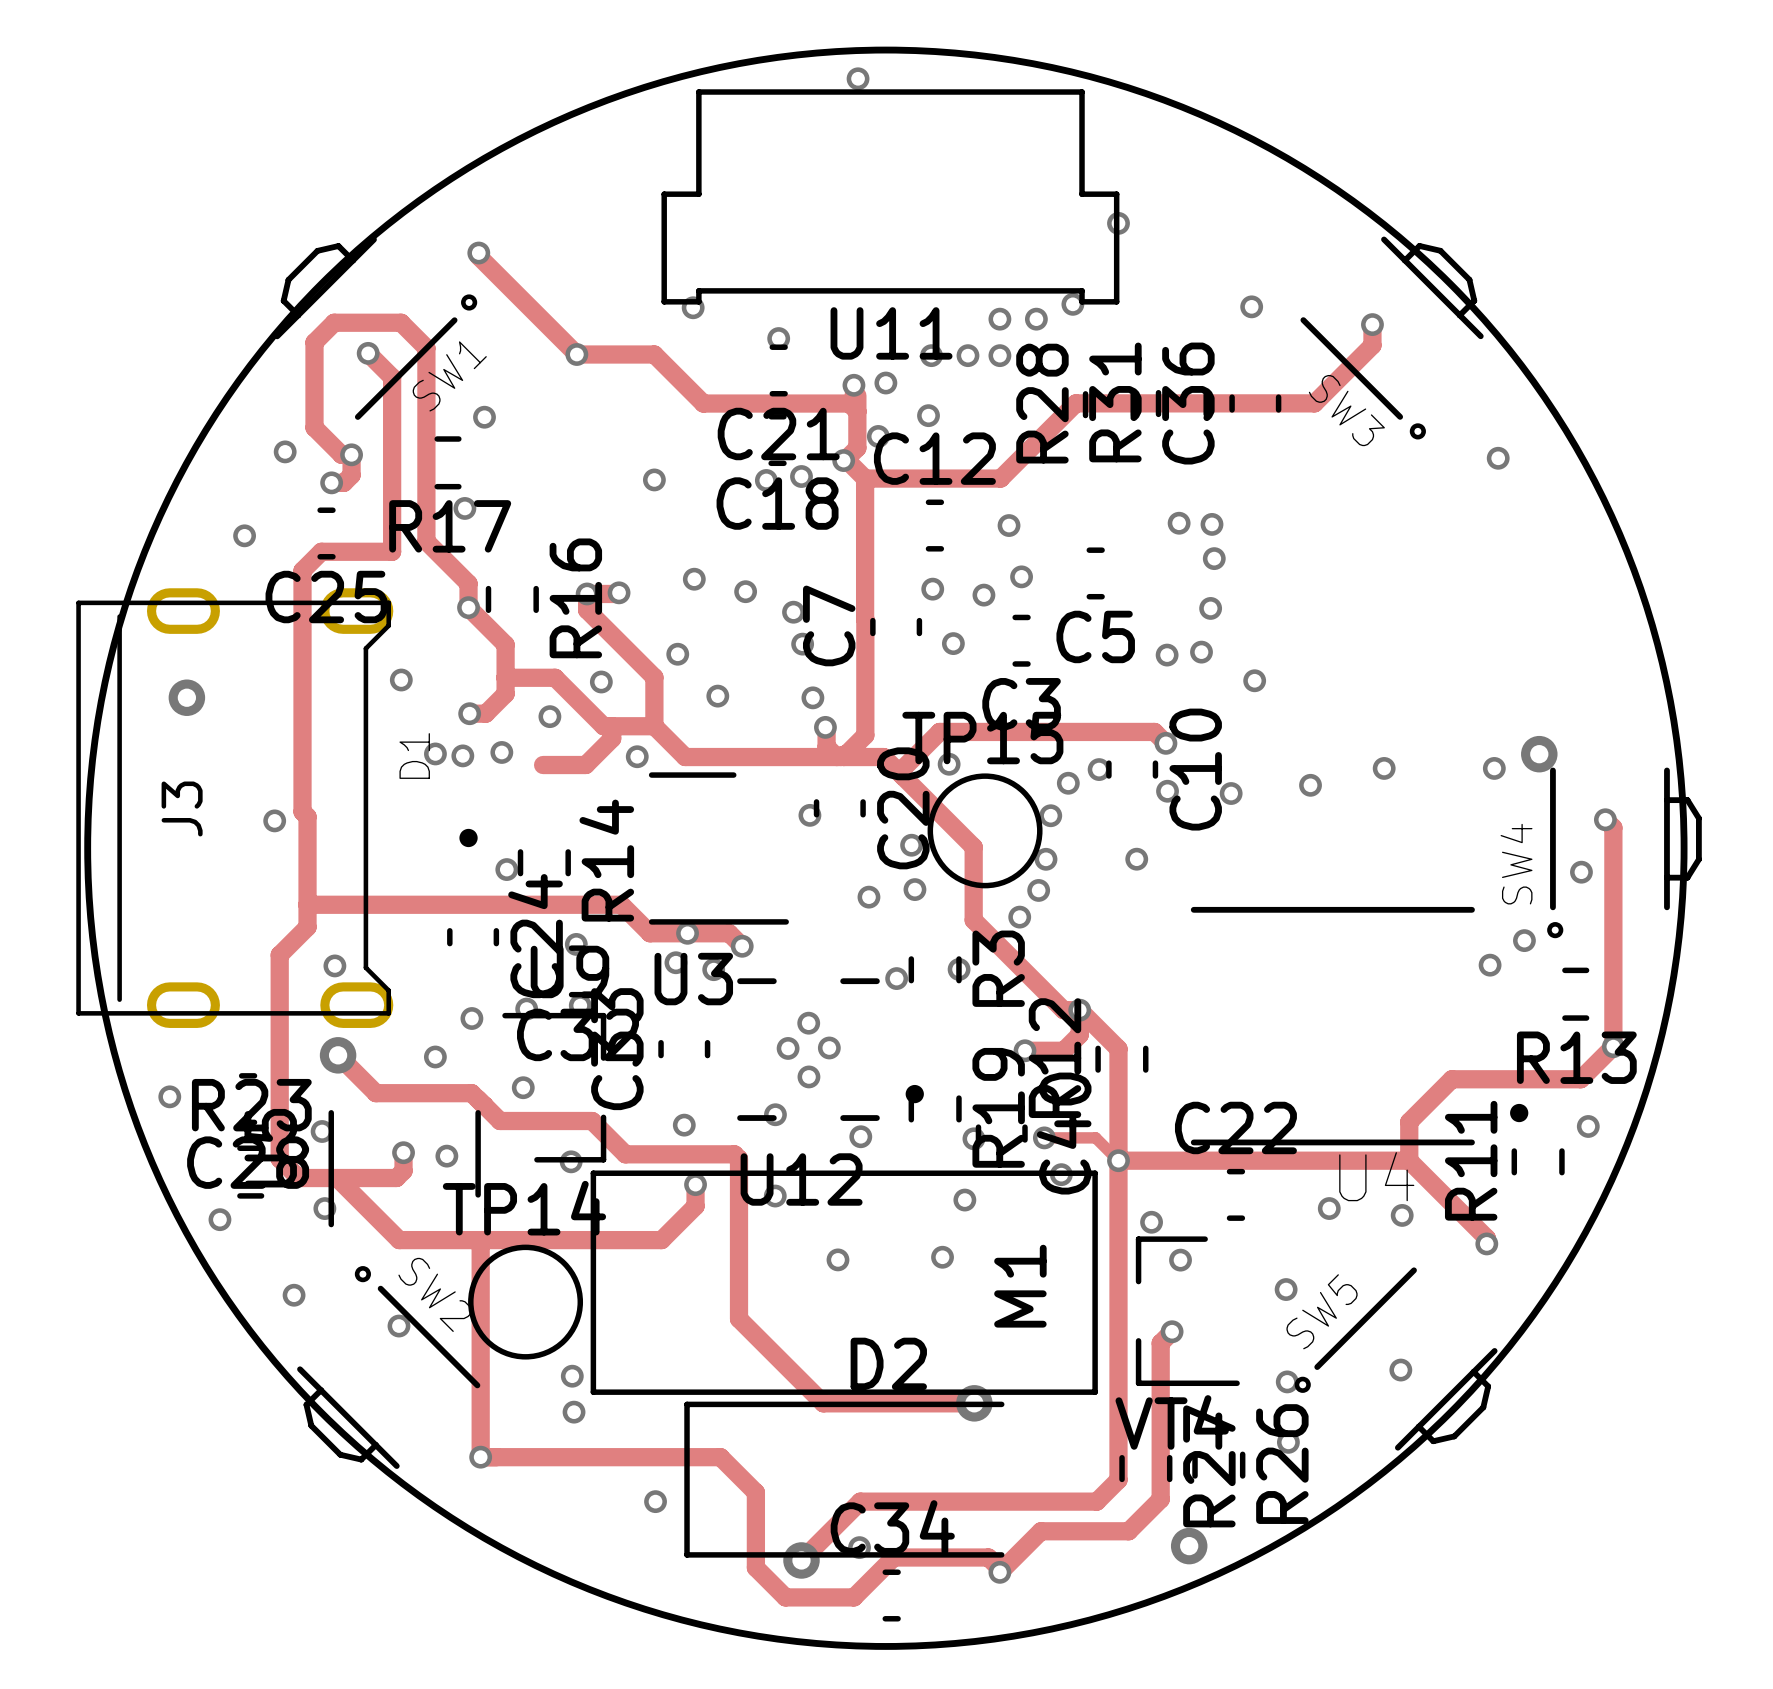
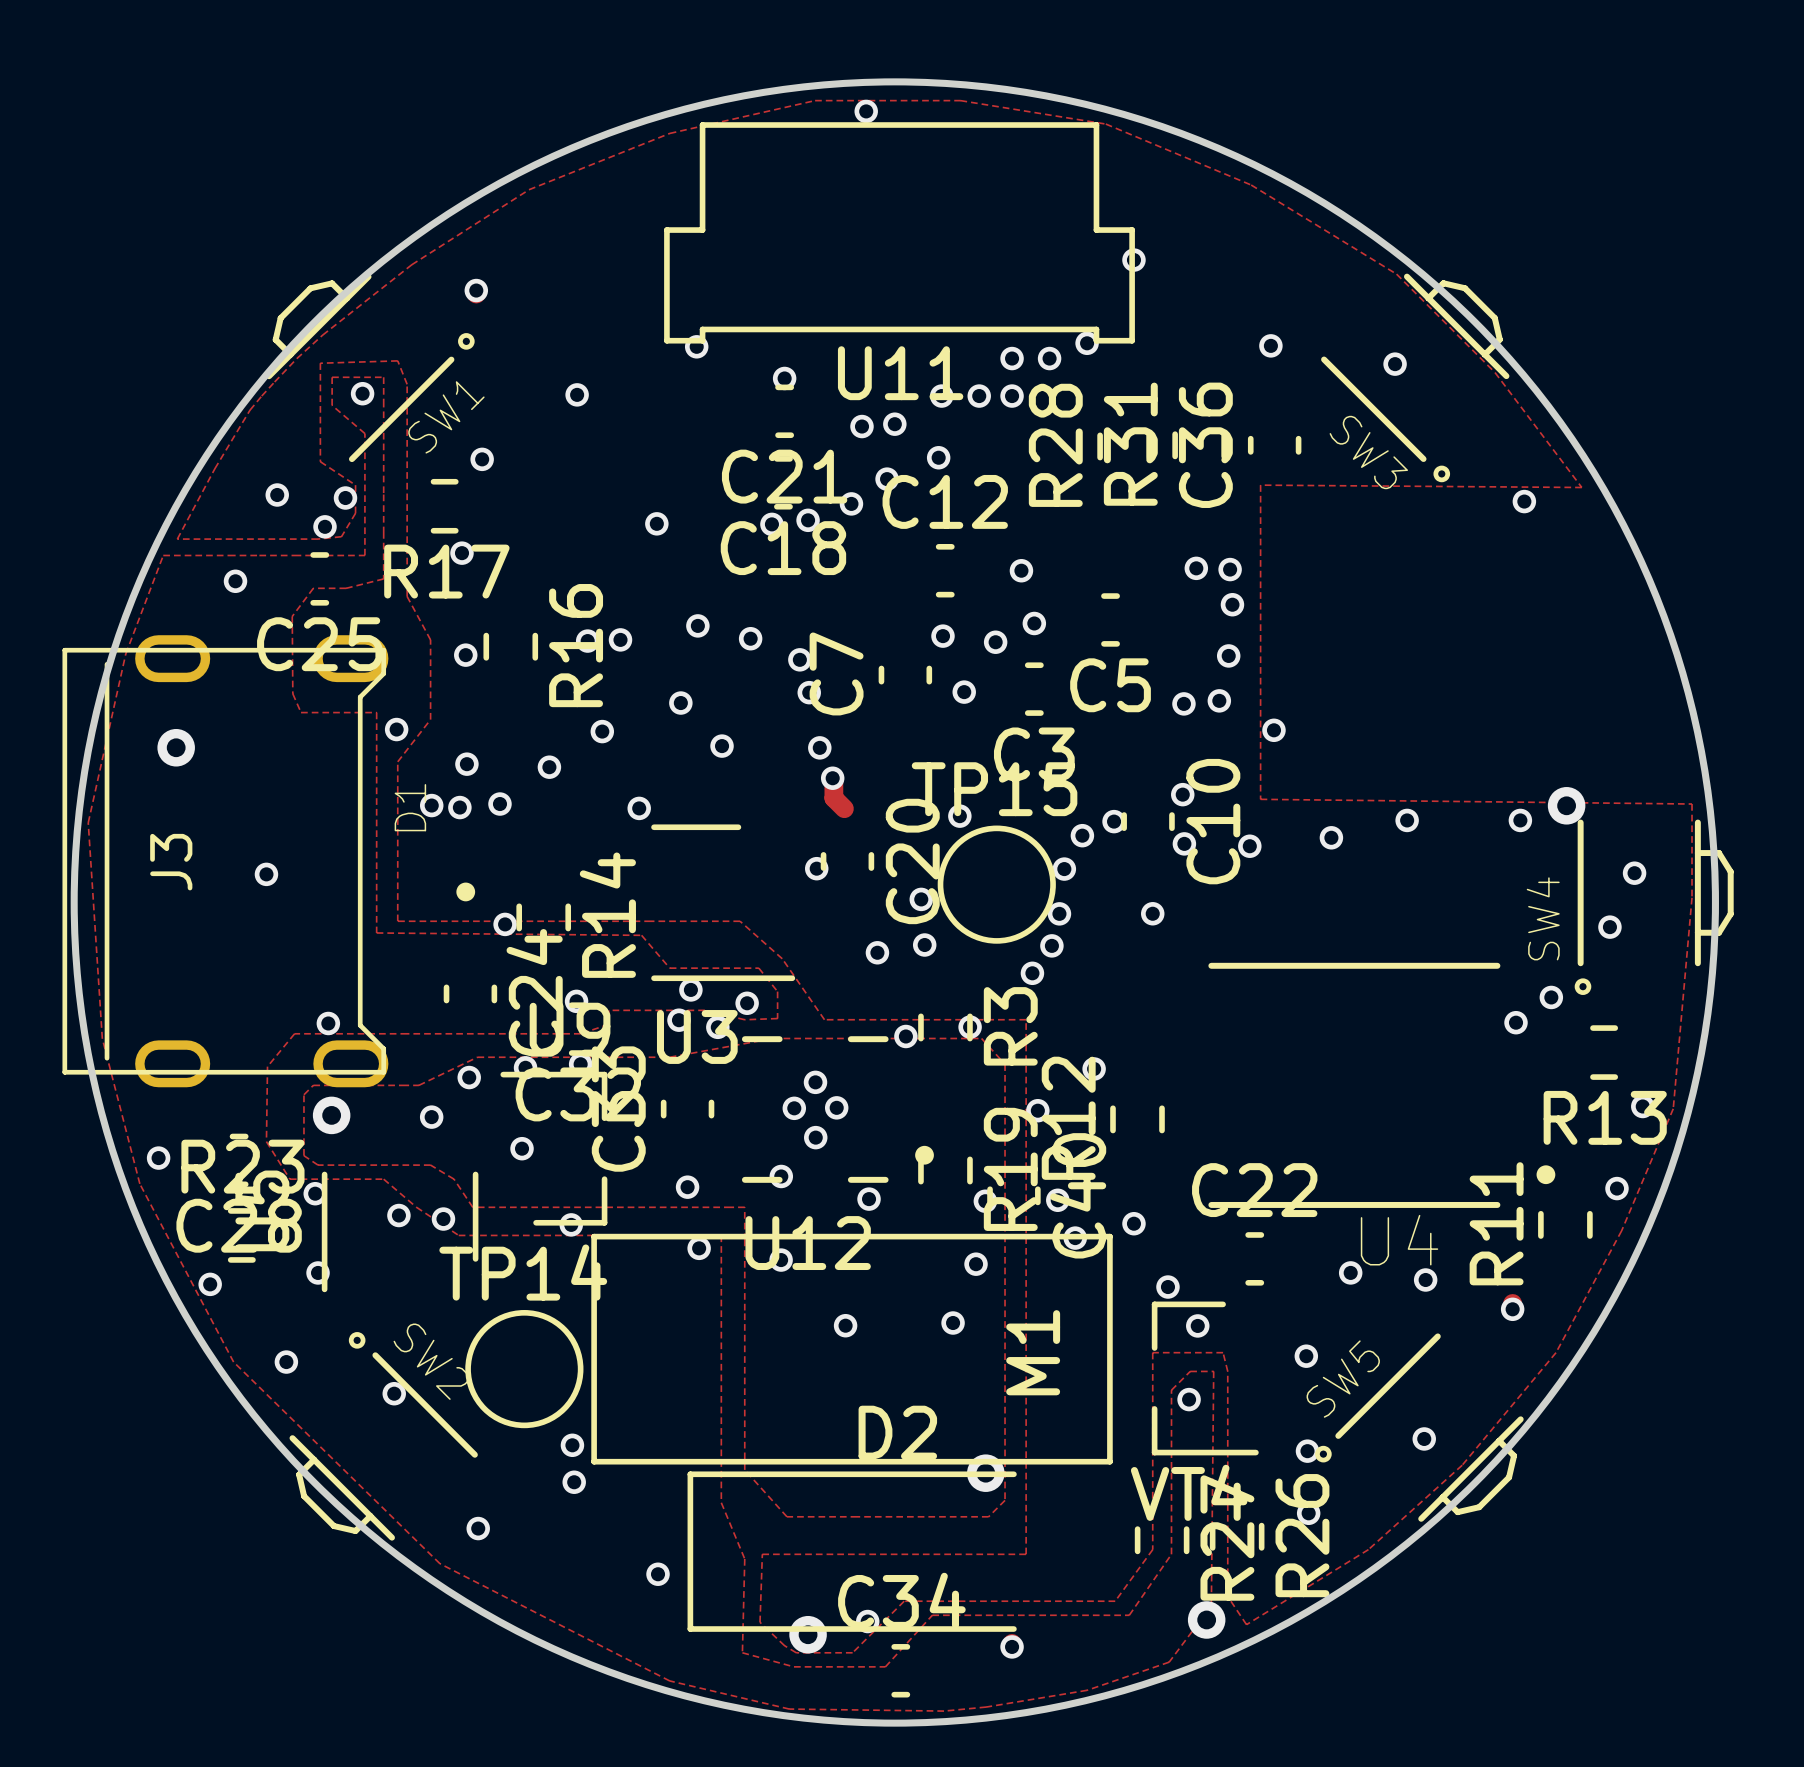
zone outline: none -> (815, 100) (669, 133) (529, 189) (411, 264) (322, 335) (296, 358) (261, 396) (250, 410) (214, 468) (177, 539) (318, 539) (341, 536) (355, 513) (355, 485) (320, 461) (320, 363) (397, 360) (407, 384) (407, 596) (430, 639) (430, 719) (397, 761) (397, 921) (740, 921) (782, 958) (824, 1019) (1026, 1019) (1026, 1554) (762, 1554) (760, 1622) (784, 1645) (796, 1652) (852, 1652) (904, 1601) (1115, 1601) (1152, 1549) (1152, 1352) (1223, 1352) (1227, 1371) (1227, 1596) (1246, 1624) (1368, 1549) (1462, 1465) (1556, 1352) (1621, 1230) (1673, 1108) (1692, 897) (1692, 804) (1260, 799) (1260, 485) (1581, 487) (1495, 372) (1396, 274) (1251, 185) (1105, 124) (960, 100) (815, 100)
track: (478, 256) (576, 354) (654, 354) (703, 403) (849, 403) -> none
track: (1372, 324) (1372, 345) (1314, 403) (1075, 403) (1000, 478) (865, 478) -> none
zone outline: none -> (332, 377) (332, 405) (364, 433) (364, 555) (163, 555) (125, 653) (88, 822) (102, 1038) (139, 1183) (233, 1362) (439, 1563) (669, 1680) (789, 1709) (944, 1711) (986, 1707) (1087, 1690) (1169, 1662) (1211, 1605) (1213, 1371) (1190, 1371) (1171, 1390) (1171, 1554) (1129, 1615) (932, 1615) (885, 1666) (794, 1666) (742, 1652) (744, 1559) (721, 1502) (721, 1235) (458, 1235) (416, 1207) (383, 1179) (289, 1179) (266, 1141) (267, 1066) (294, 1033) (580, 1033) (608, 1024) (608, 1010) (704, 1010) (744, 1019) (777, 1018) (777, 991) (758, 968) (669, 968) (641, 935) (376, 932) (376, 712) (301, 712) (292, 693) (292, 616) (313, 588) (346, 588) (383, 578) (383, 377) (332, 377)
track: (368, 353) (392, 377) (392, 551) (321, 551) (302, 570) (302, 811) (307, 816) (307, 927) (279, 954) (279, 1158) (298, 1178) (396, 1178) (403, 1170) (403, 1152) -> none
track: (857, 395) (857, 448) (845, 459) (865, 478) -> none
track: (865, 478) (865, 618) -> none
track: (331, 482) (343, 482) (351, 475) (351, 454) (341, 454) (314, 427) (314, 342) (334, 322) (401, 322) (426, 348) (426, 541) (468, 583) (468, 607) (505, 644) (505, 693) (485, 713) (469, 713) -> none
track: (617, 593) (587, 593) (587, 610) (654, 677) (654, 726) -> none
track: (865, 619) (865, 735) (843, 757) -> none
track: (507, 679) (505, 677) (555, 677) (603, 726) (654, 726) -> none
track: (612, 726) (612, 738) (585, 765) (543, 765) -> none
track: (654, 726) (685, 757) (841, 757) (843, 754) (843, 757) -> none
track: (1165, 743) (1154, 731) (939, 731) (902, 768) (902, 776) -> none
track: (843, 757) (883, 757) (973, 847) (973, 920) (1063, 1010) (1079, 1010) -> none
track: (1605, 819) (1613, 827) (1613, 1046) (1580, 1079) (1451, 1079) (1409, 1121) (1409, 1160) -> none
track: (307, 904) (621, 904) (650, 933) (729, 933) (742, 946) -> none
zone outline: none -> (772, 1038) (669, 1057) (477, 1057) (418, 1085) (313, 1085) (303, 1094) (303, 1155) (318, 1165) (430, 1165) (454, 1179) (472, 1207) (744, 1207) (744, 1469) (786, 1516) (988, 1516) (1005, 1500) (1005, 1064) (981, 1038) (772, 1038)
track: (1079, 1010) (1118, 1048) (1118, 1479) (1096, 1501) (860, 1501) (801, 1560) -> none
track: (1079, 1010) (1079, 1034) (1063, 1050) (1024, 1050) -> none
track: (338, 1055) (375, 1093) (471, 1093) (484, 1105) -> none
track: (477, 1098) (500, 1121) (592, 1121) (625, 1154) (734, 1154) (739, 1158) (739, 1318) (823, 1403) (974, 1403) -> none
track: (1044, 1137) (1095, 1137) (1118, 1160) (1409, 1160) -> none
track: (1409, 1160) (1486, 1238) -> none
track: (337, 1178) (399, 1240) (661, 1240) (695, 1206) (695, 1184) -> none
track: (480, 1240) (480, 1457) (720, 1457) (755, 1492) (755, 1567) (785, 1597) (853, 1597) (893, 1557) (988, 1557) (999, 1568) -> none
track: (1172, 1331) (1160, 1343) (1160, 1499) (1128, 1531) (1040, 1531) (999, 1572) -> none

